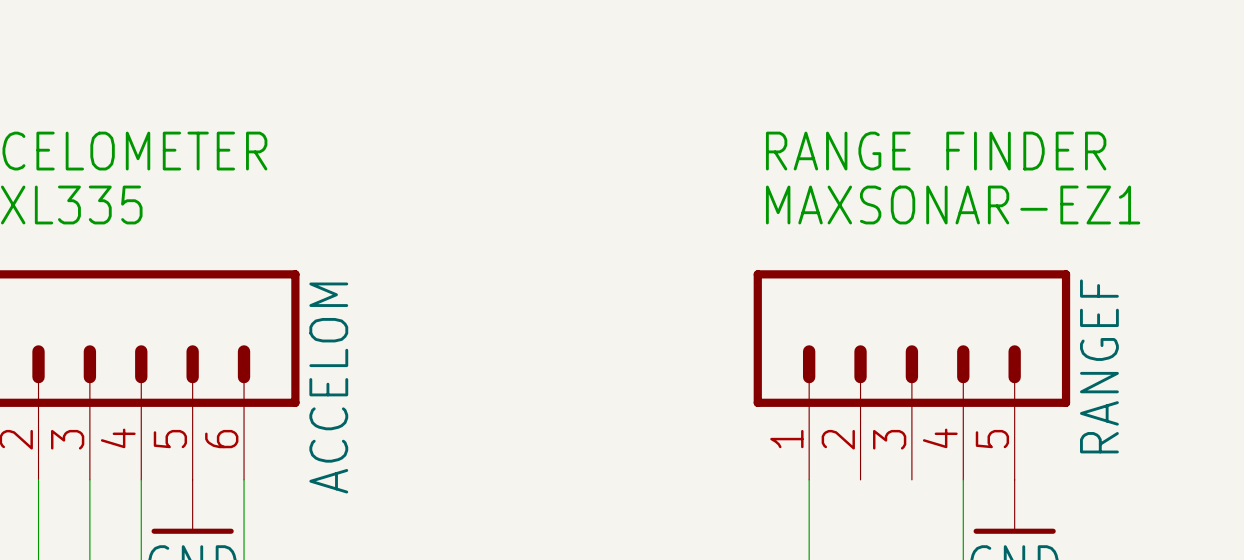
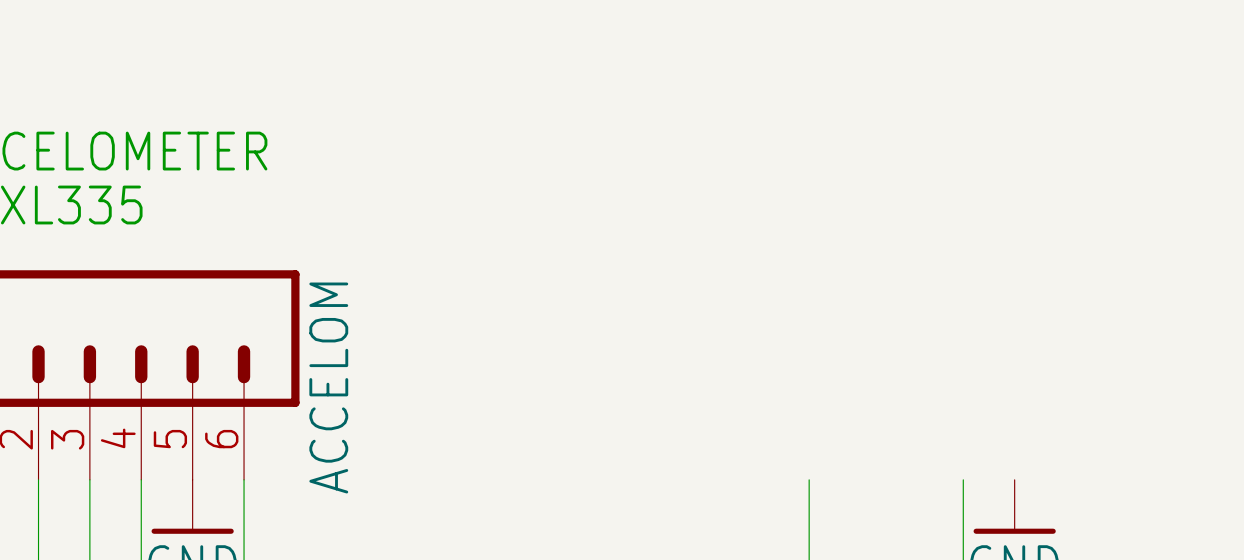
text: RANGE FINDER (936, 151) -> none
text: MAXSONAR-EZ1 (953, 205) -> none
RANGEF: (911, 375) -> none

